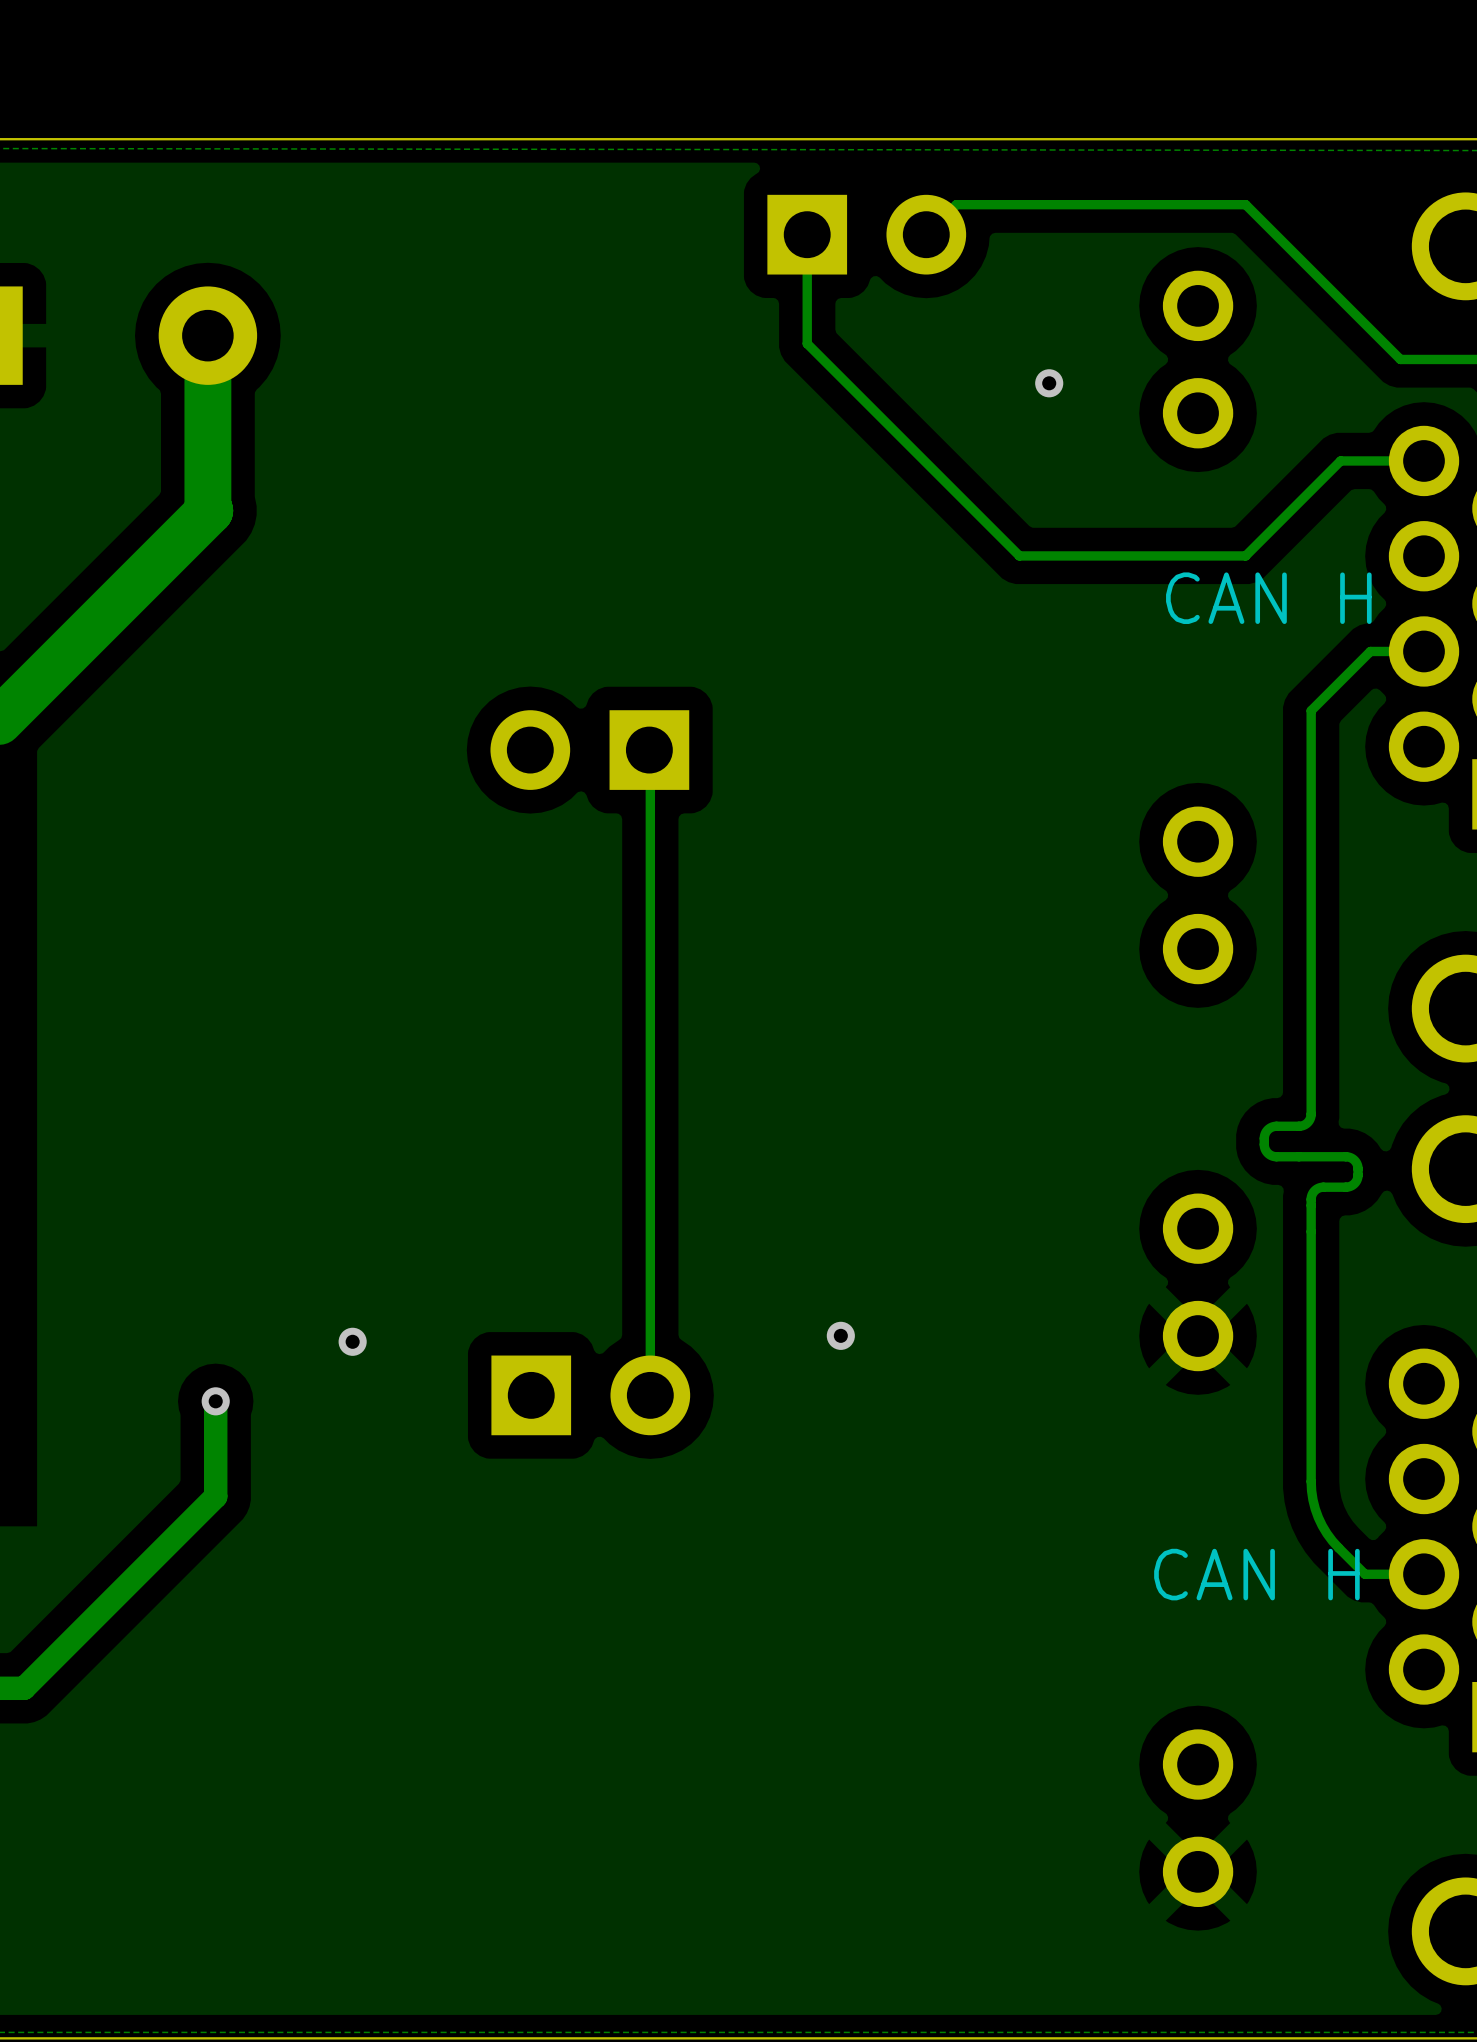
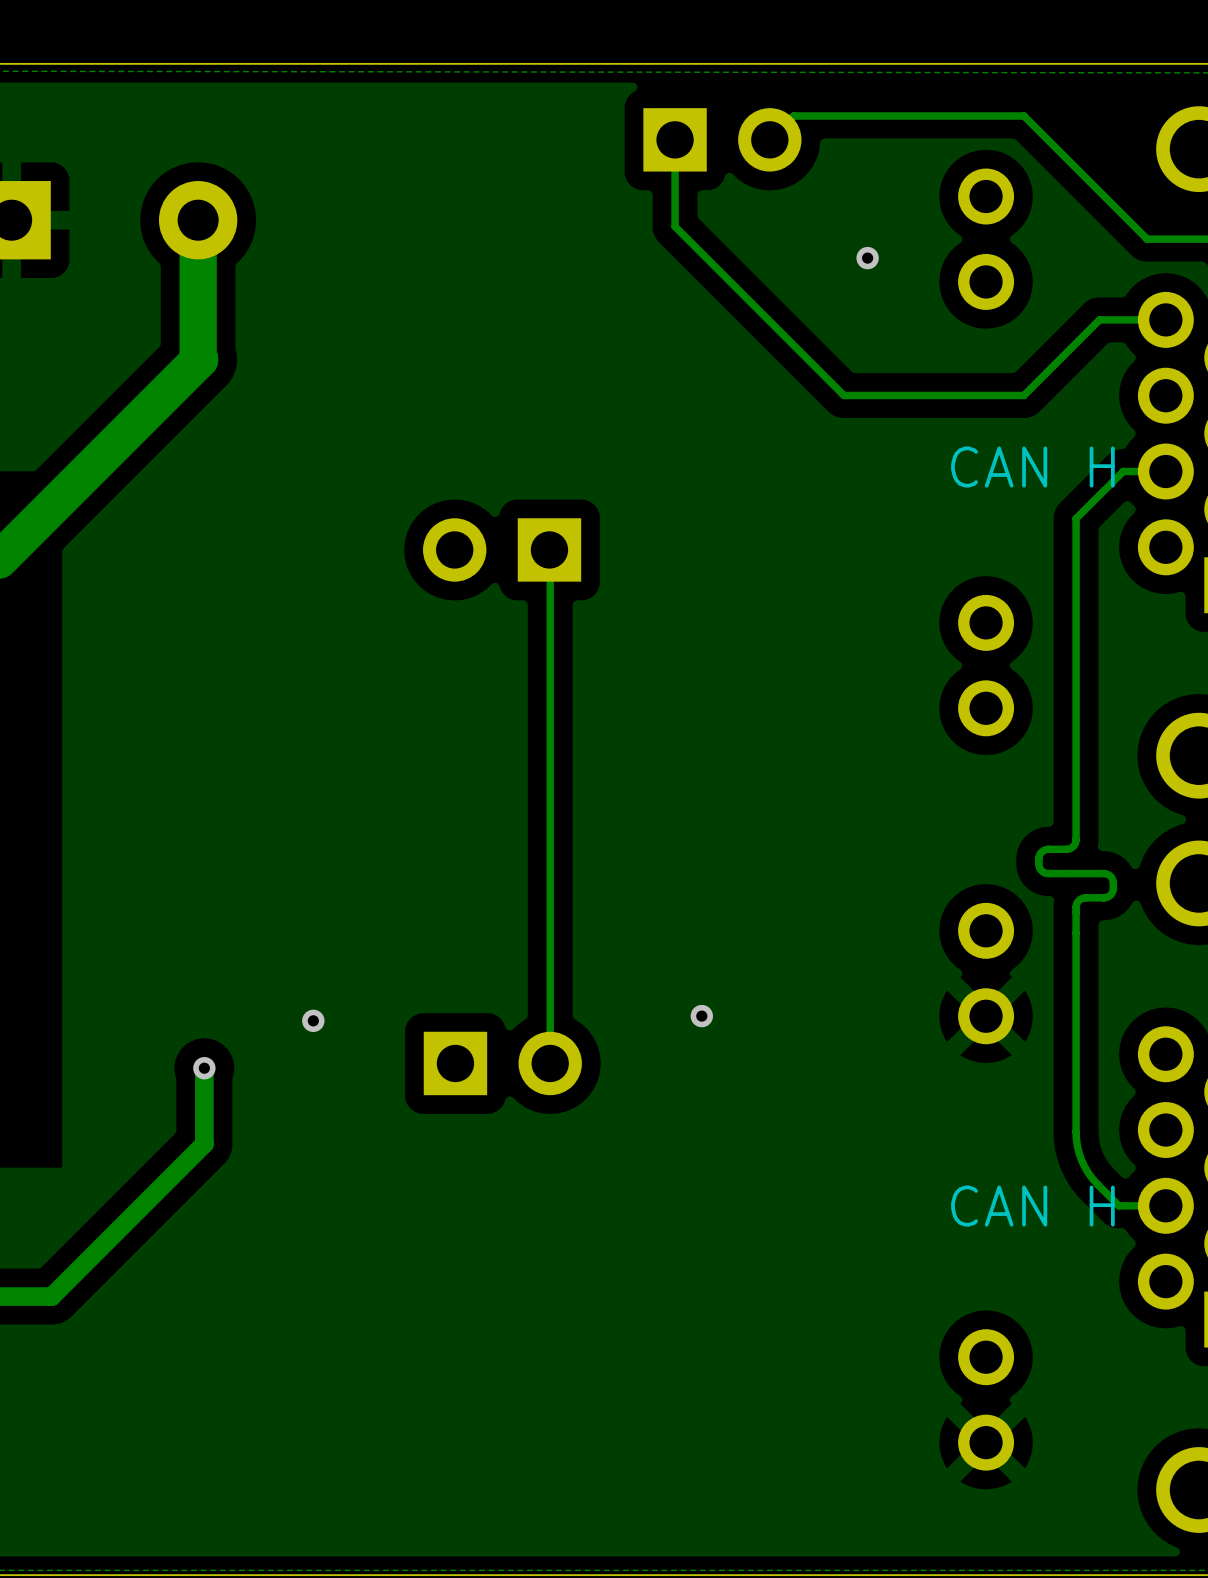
text position: CAN H (1268, 598) -> CAN H (1032, 467)

